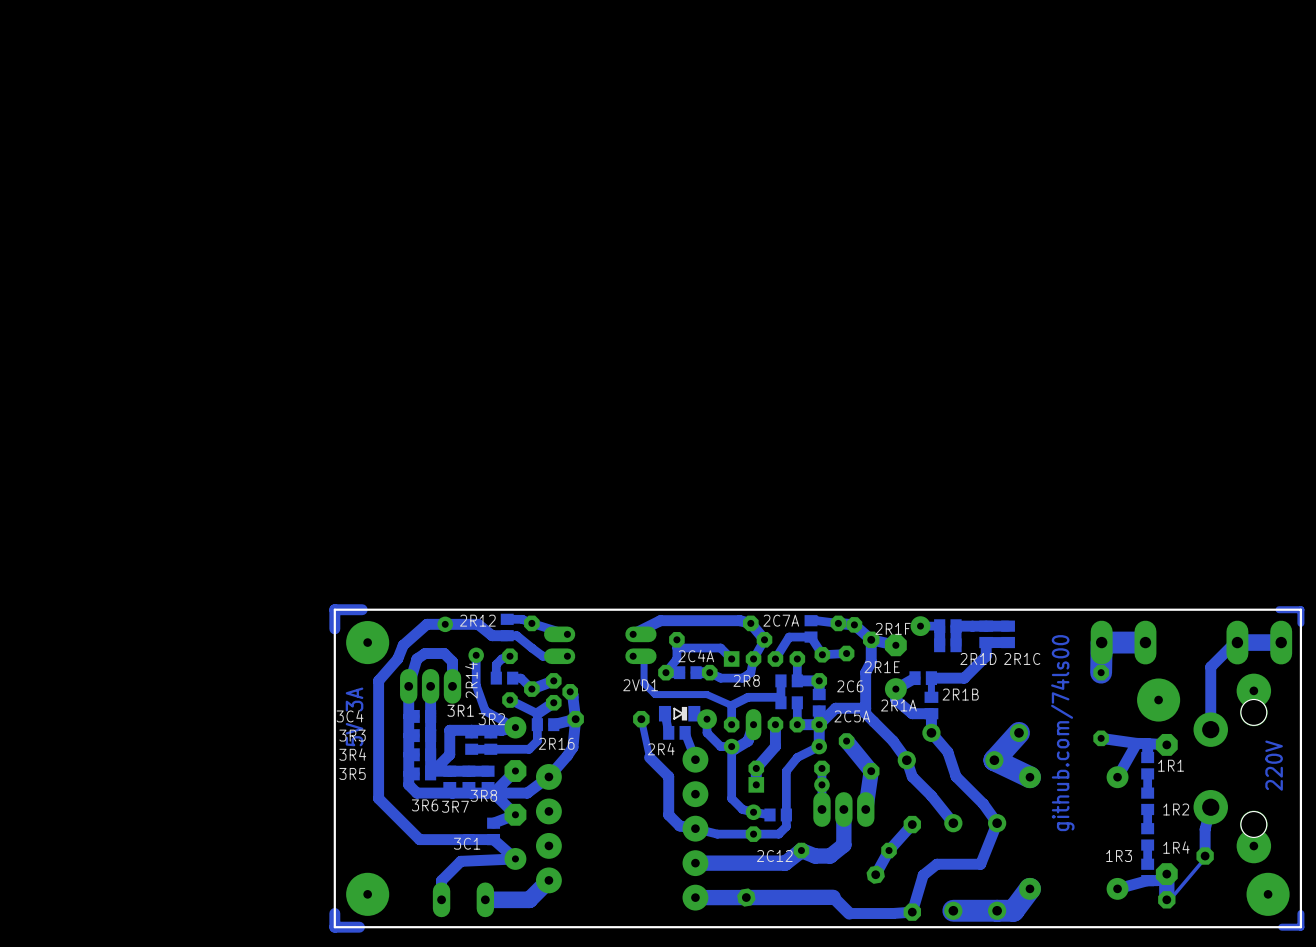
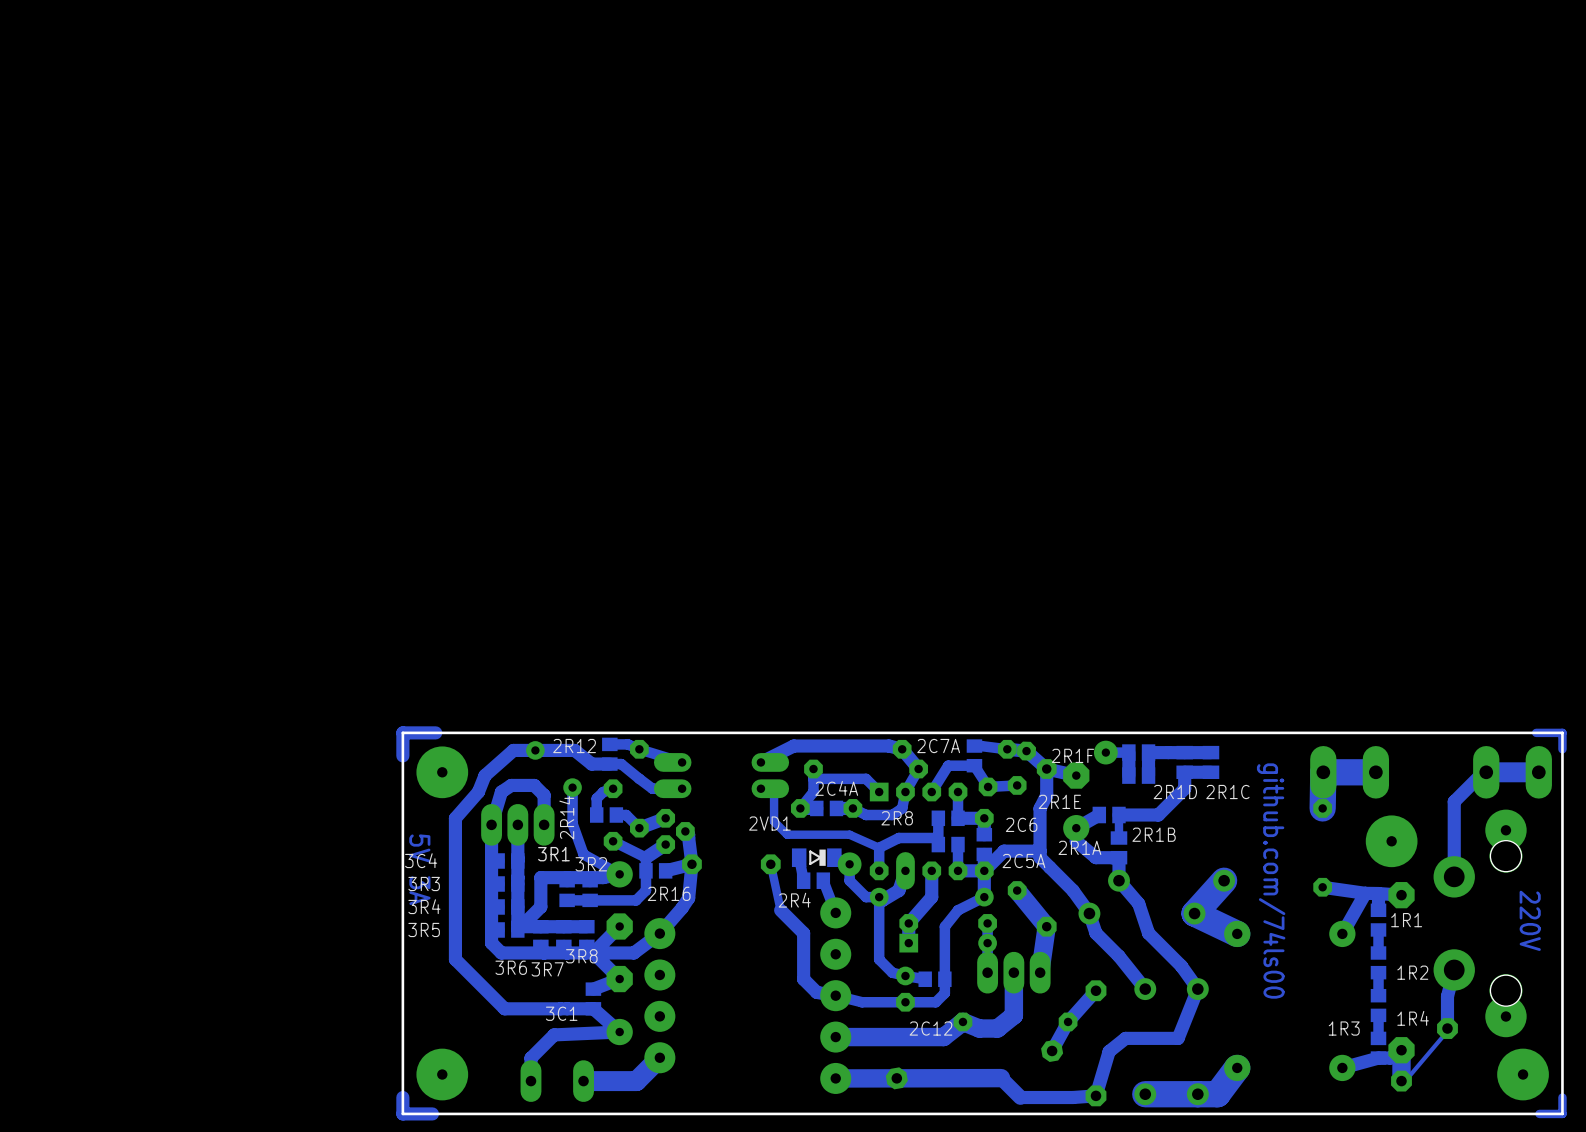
text rotation: 0° (354, 716) -> 180° (419, 869)
text rotation: 0° (1062, 733) -> 180° (1271, 881)
text rotation: 0° (1274, 765) -> 180° (1530, 920)

